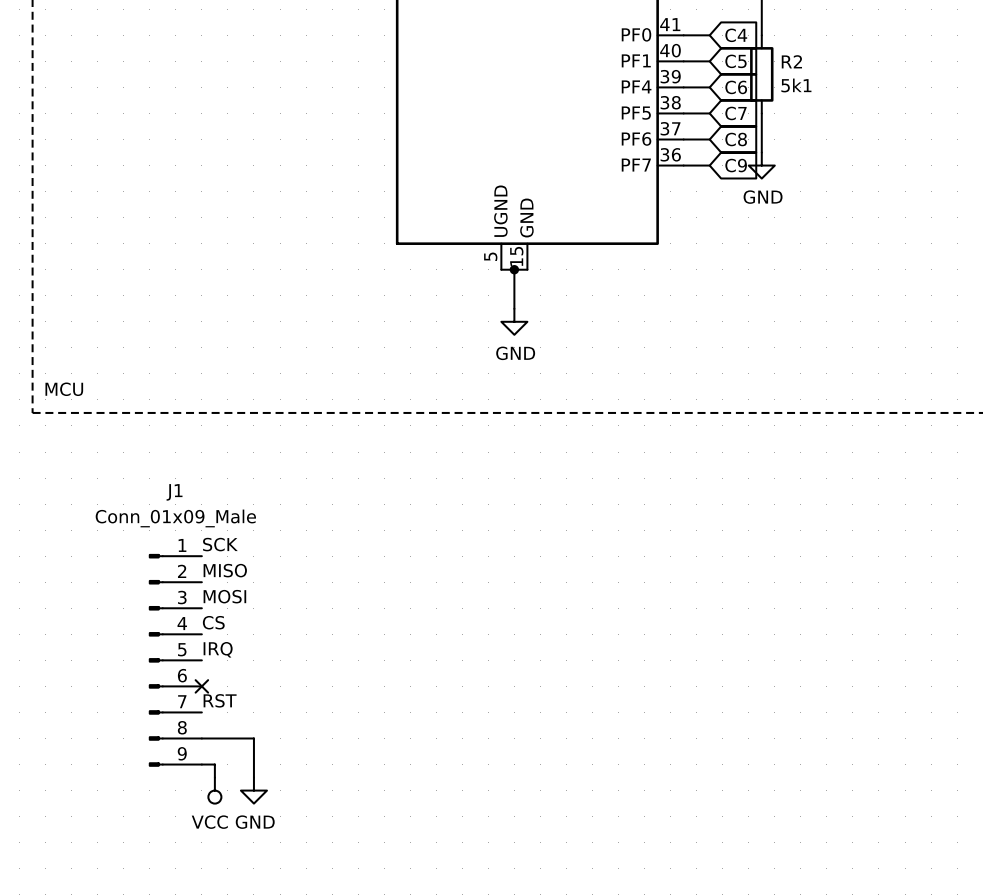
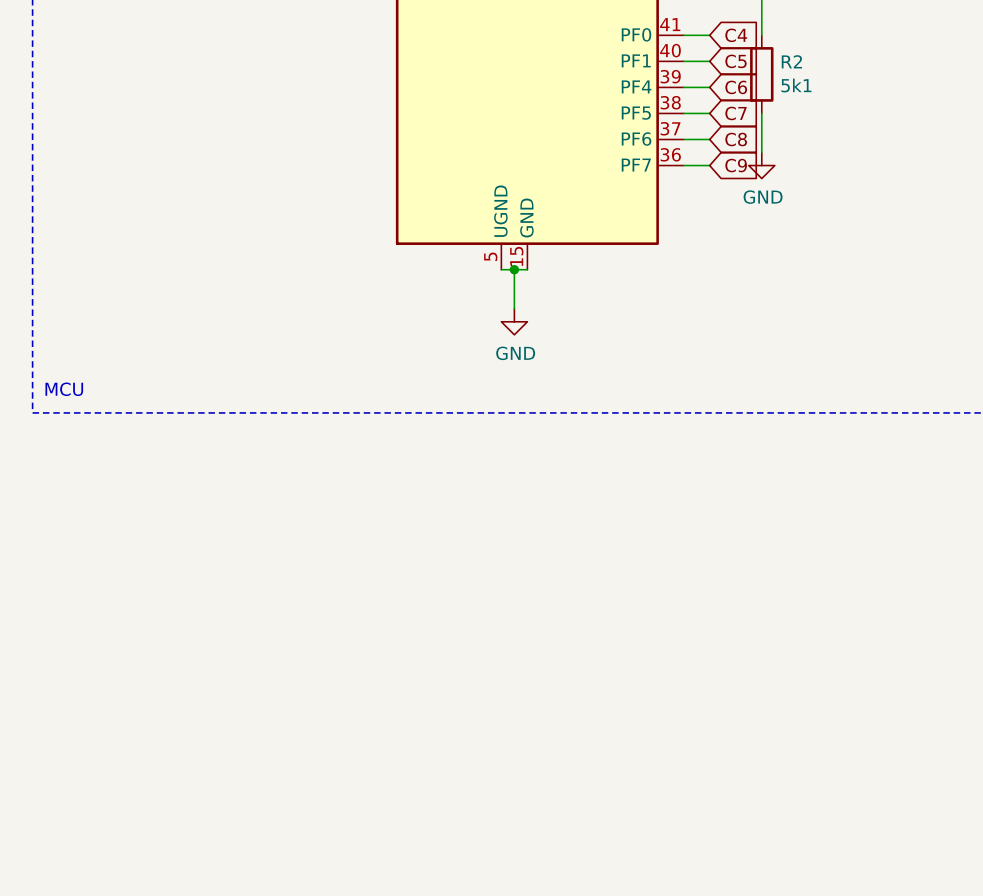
label: SCK (220, 544) -> none
label: MISO (225, 570) -> none
label: MOSI (224, 596) -> none
label: CS (213, 622) -> none
label: IRQ (218, 649) -> none
J1: Conn_01x09_Male (175, 660) -> none
no-connect mark: (201, 686) -> none
label: RST (220, 700) -> none
wire: (201, 738) (253, 738) (253, 777) -> none
wire: (201, 764) (214, 764) (214, 777) -> none
power symbol: VCC (214, 790) -> none
power symbol: GND (253, 790) -> none

